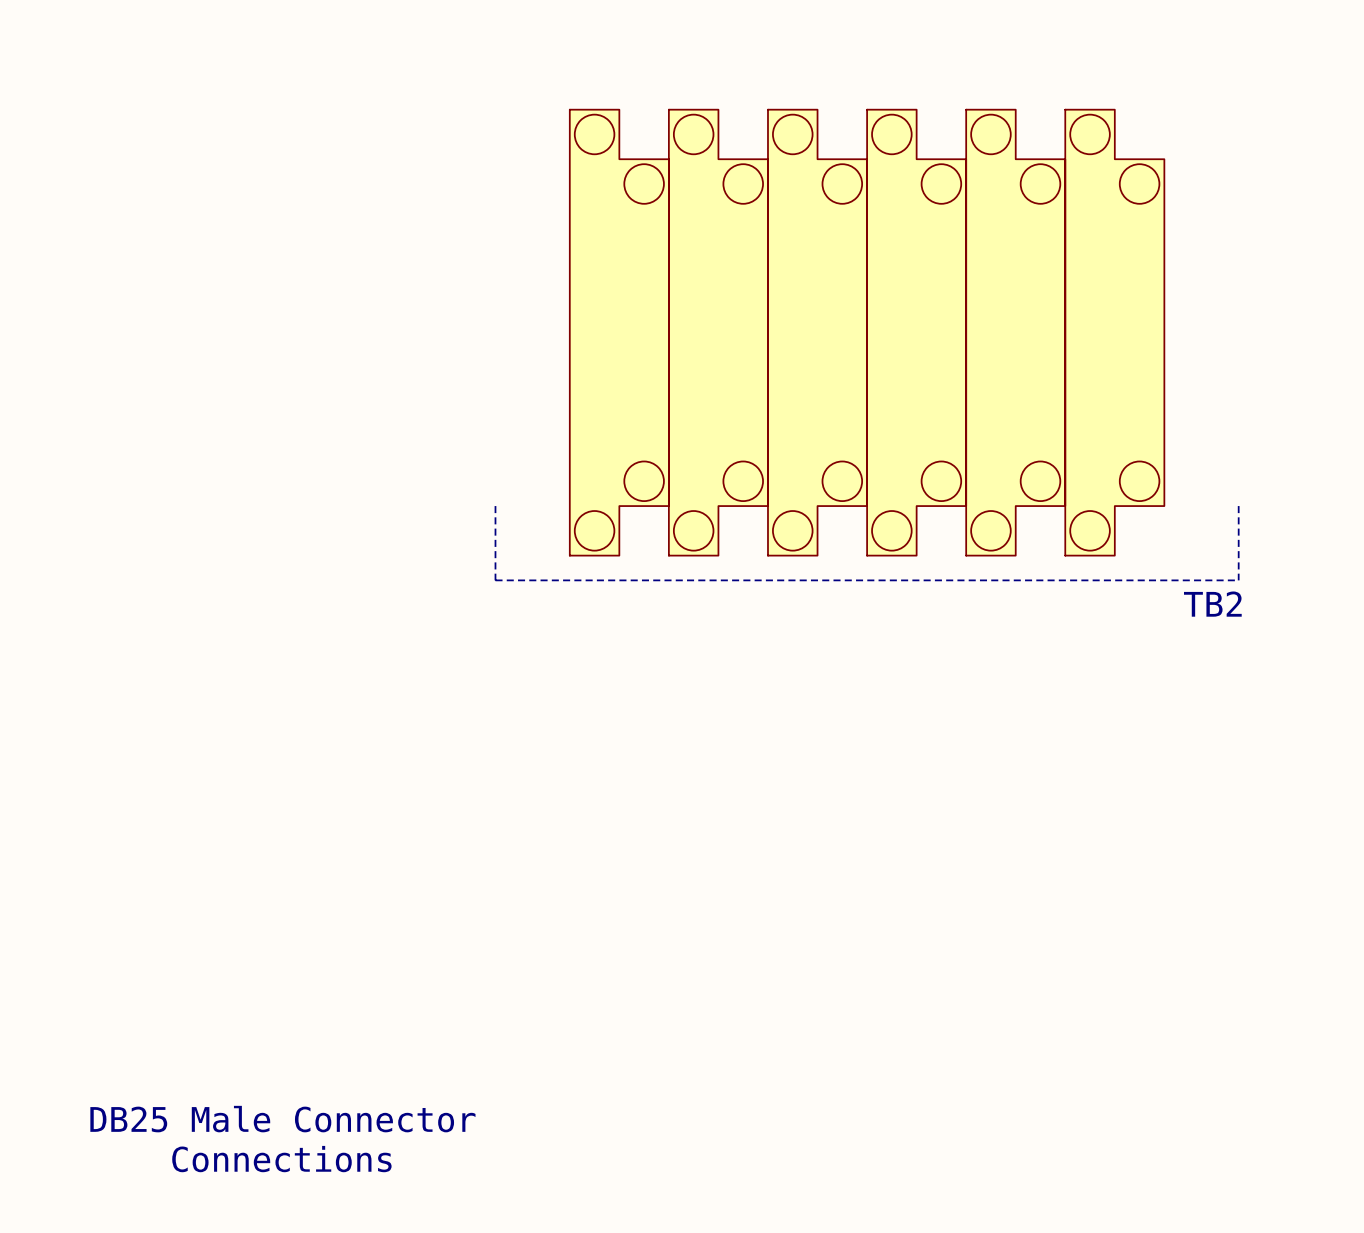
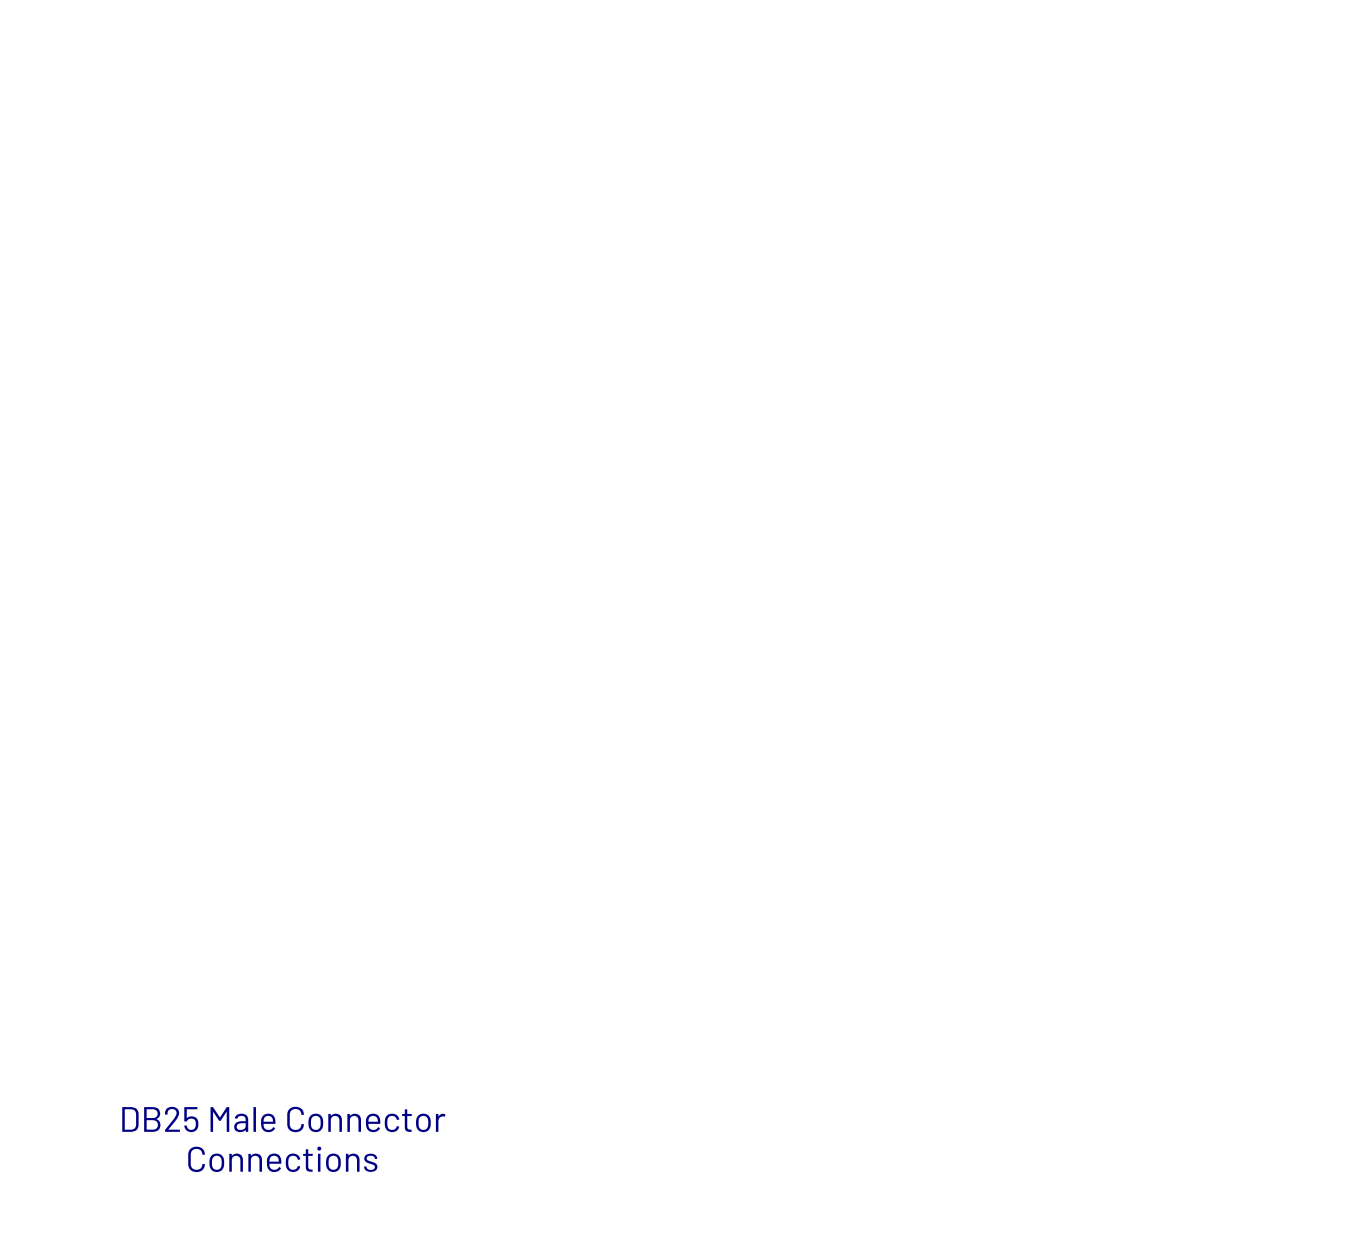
part: (619, 332) -> none
part: (718, 332) -> none
part: (817, 332) -> none
part: (916, 332) -> none
part: (1015, 332) -> none
part: (1114, 332) -> none
line: (495, 506) (495, 580) (1238, 580) (1238, 506) -> none
text: TB2 (1212, 604) -> none

